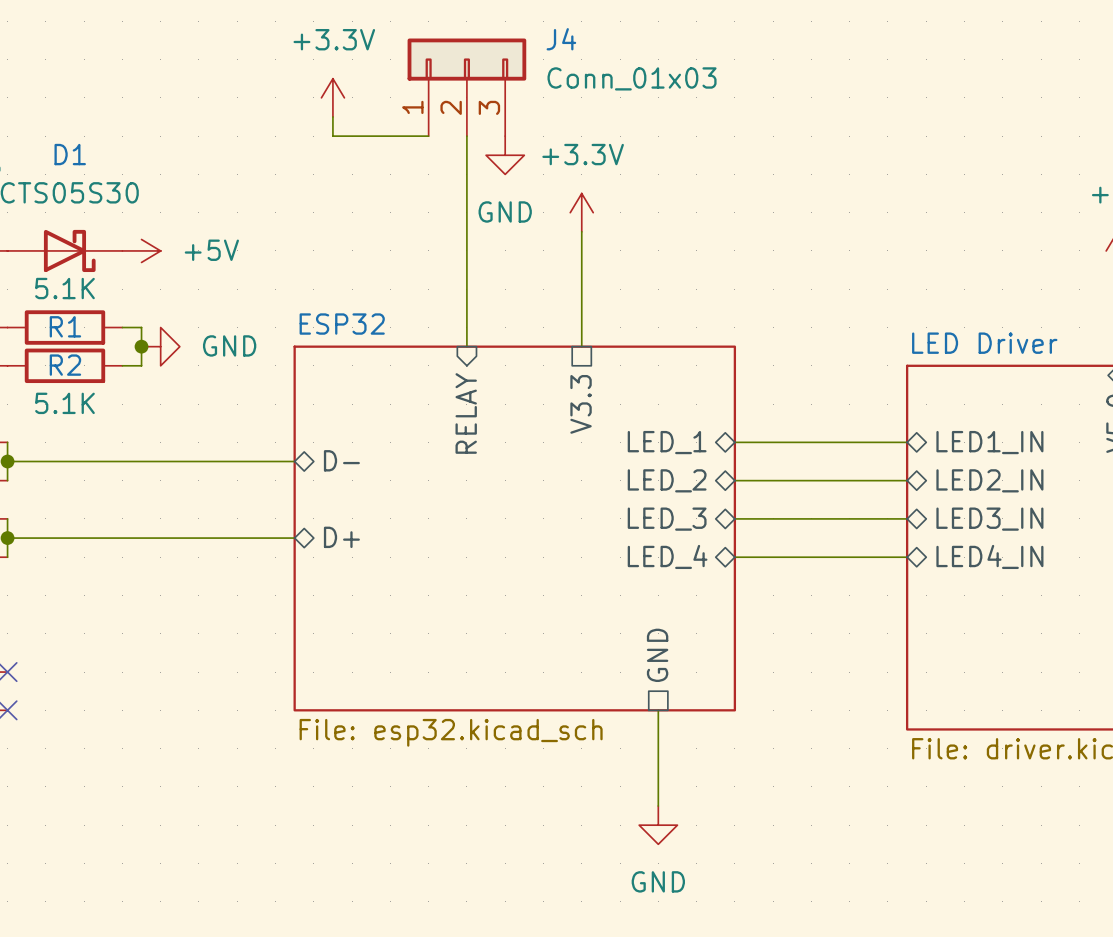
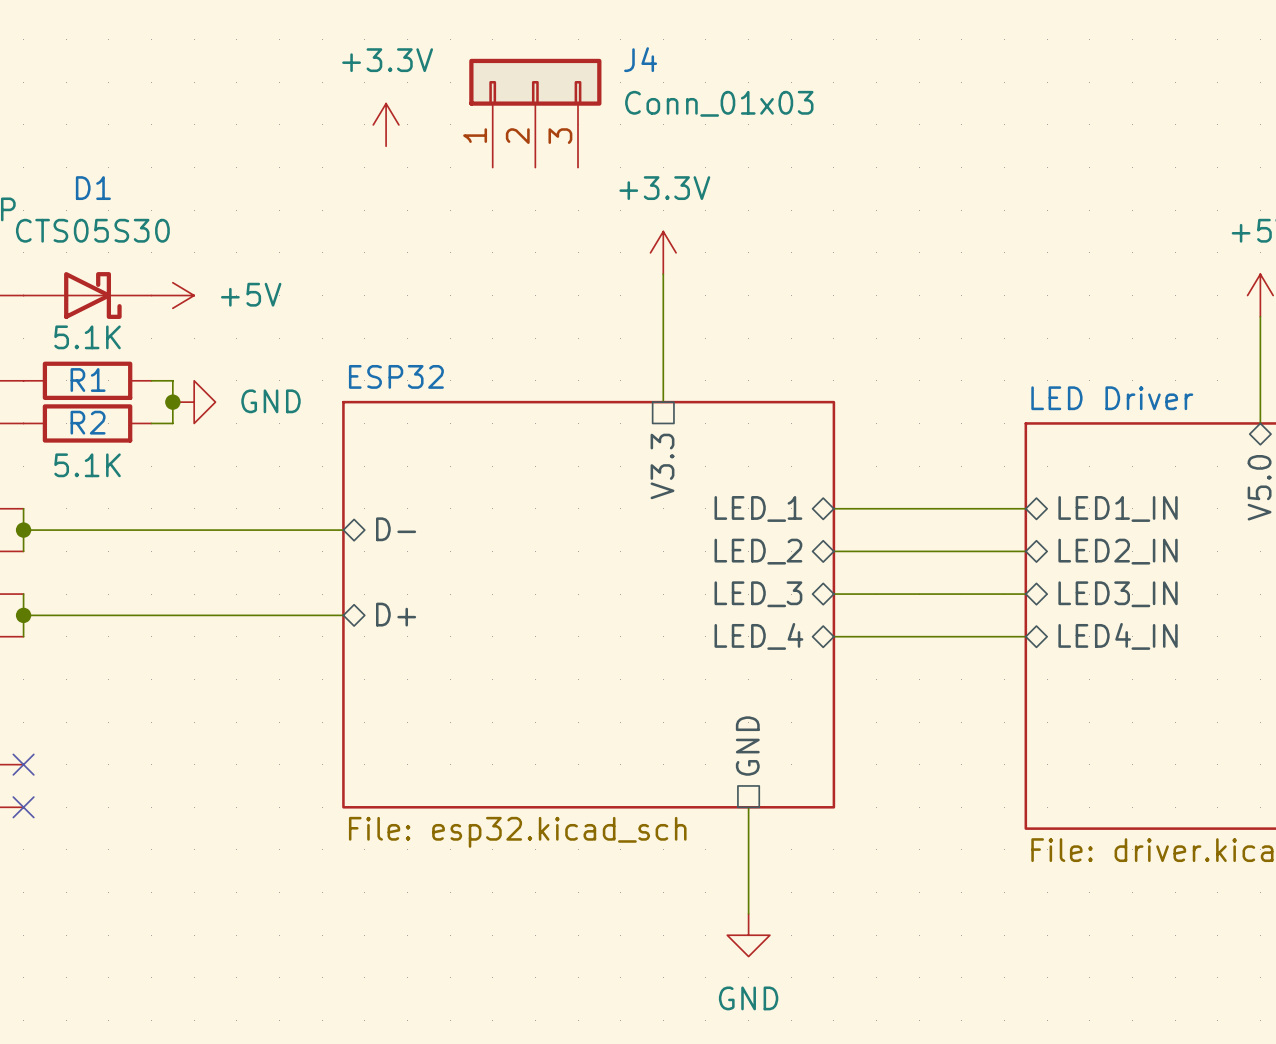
wire: (332, 116) (332, 136) (428, 136) -> none
wire: (466, 136) (466, 346) -> none
power symbol: GND (505, 155) -> none
sheet pin: RELAY (466, 413) -> none

